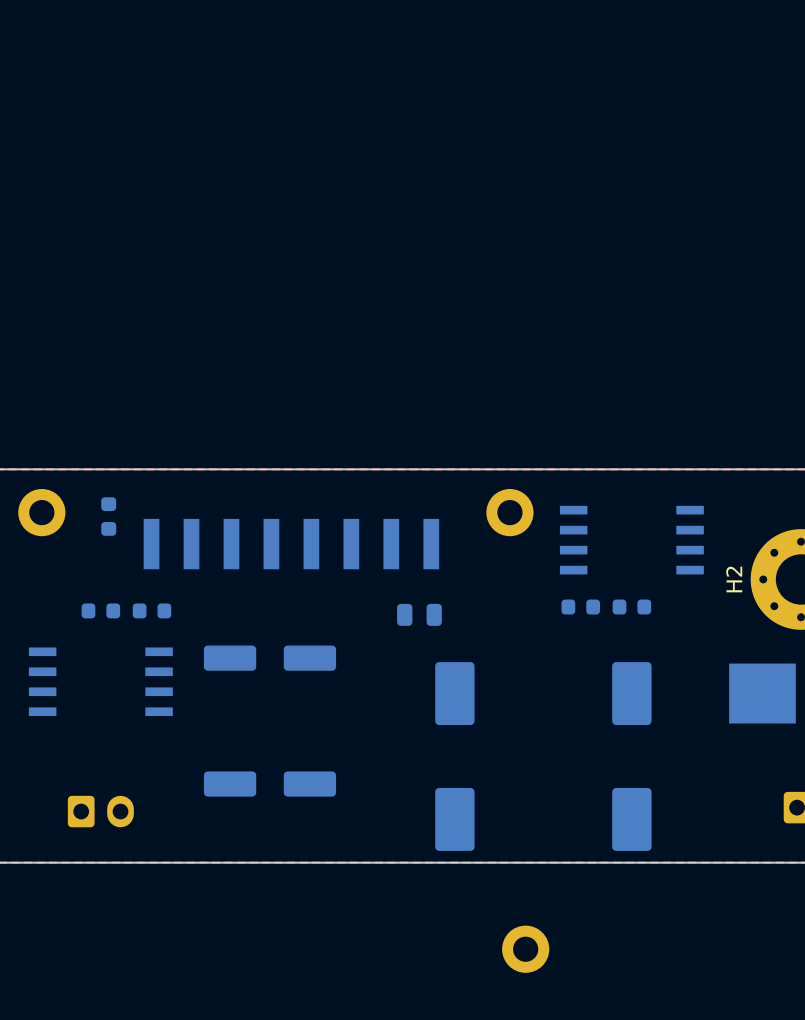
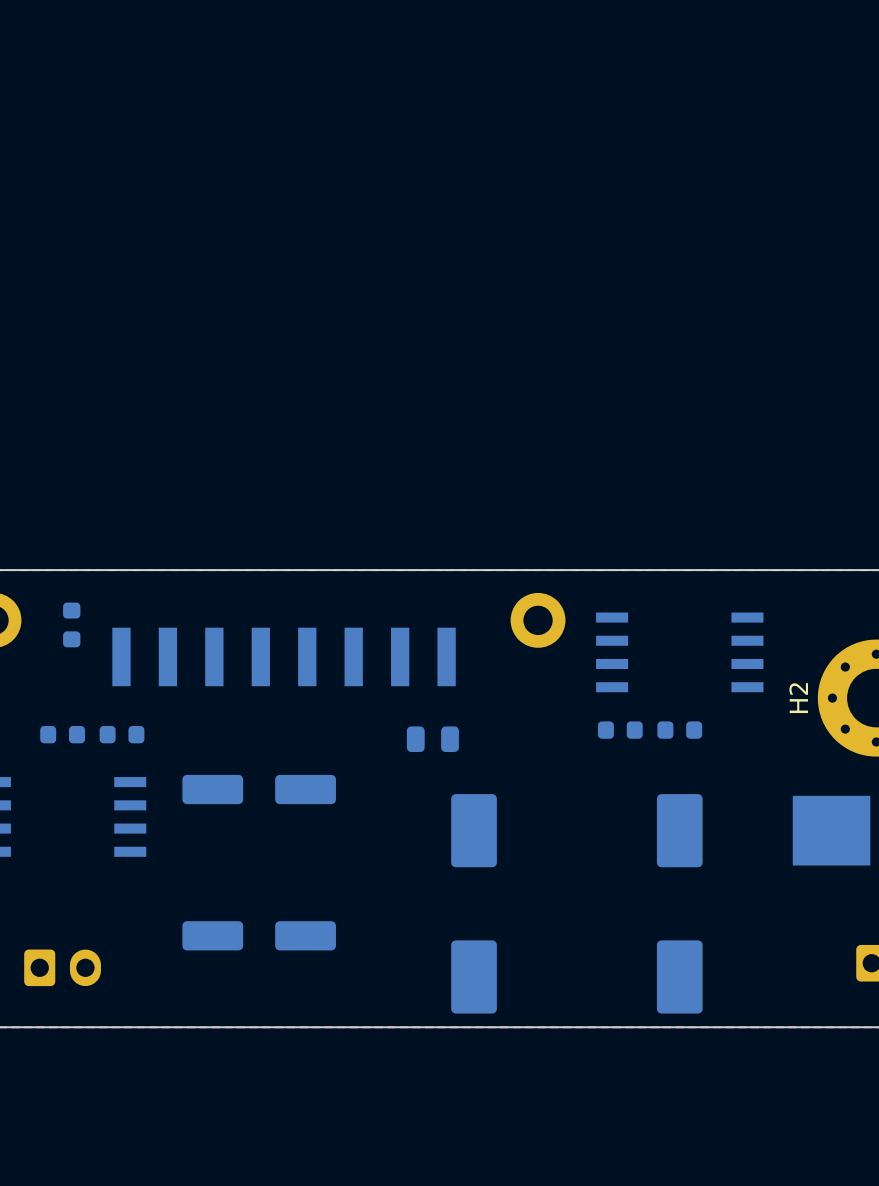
part: (525, 949) -> none

